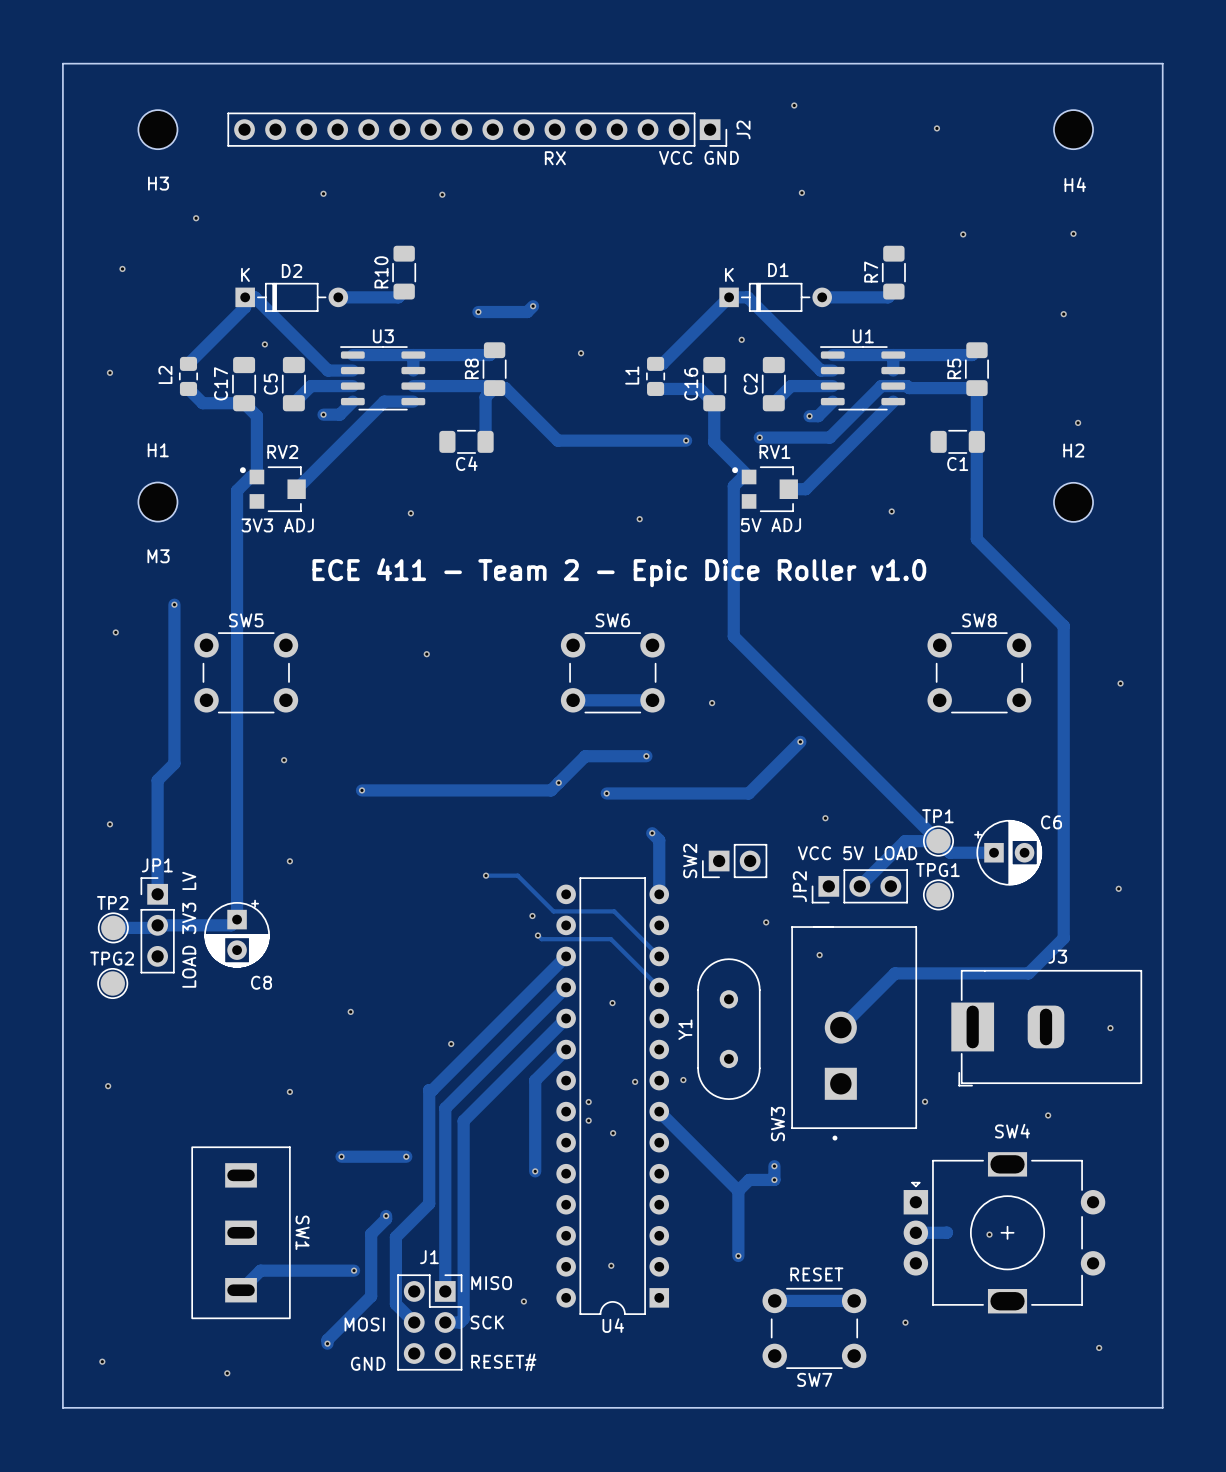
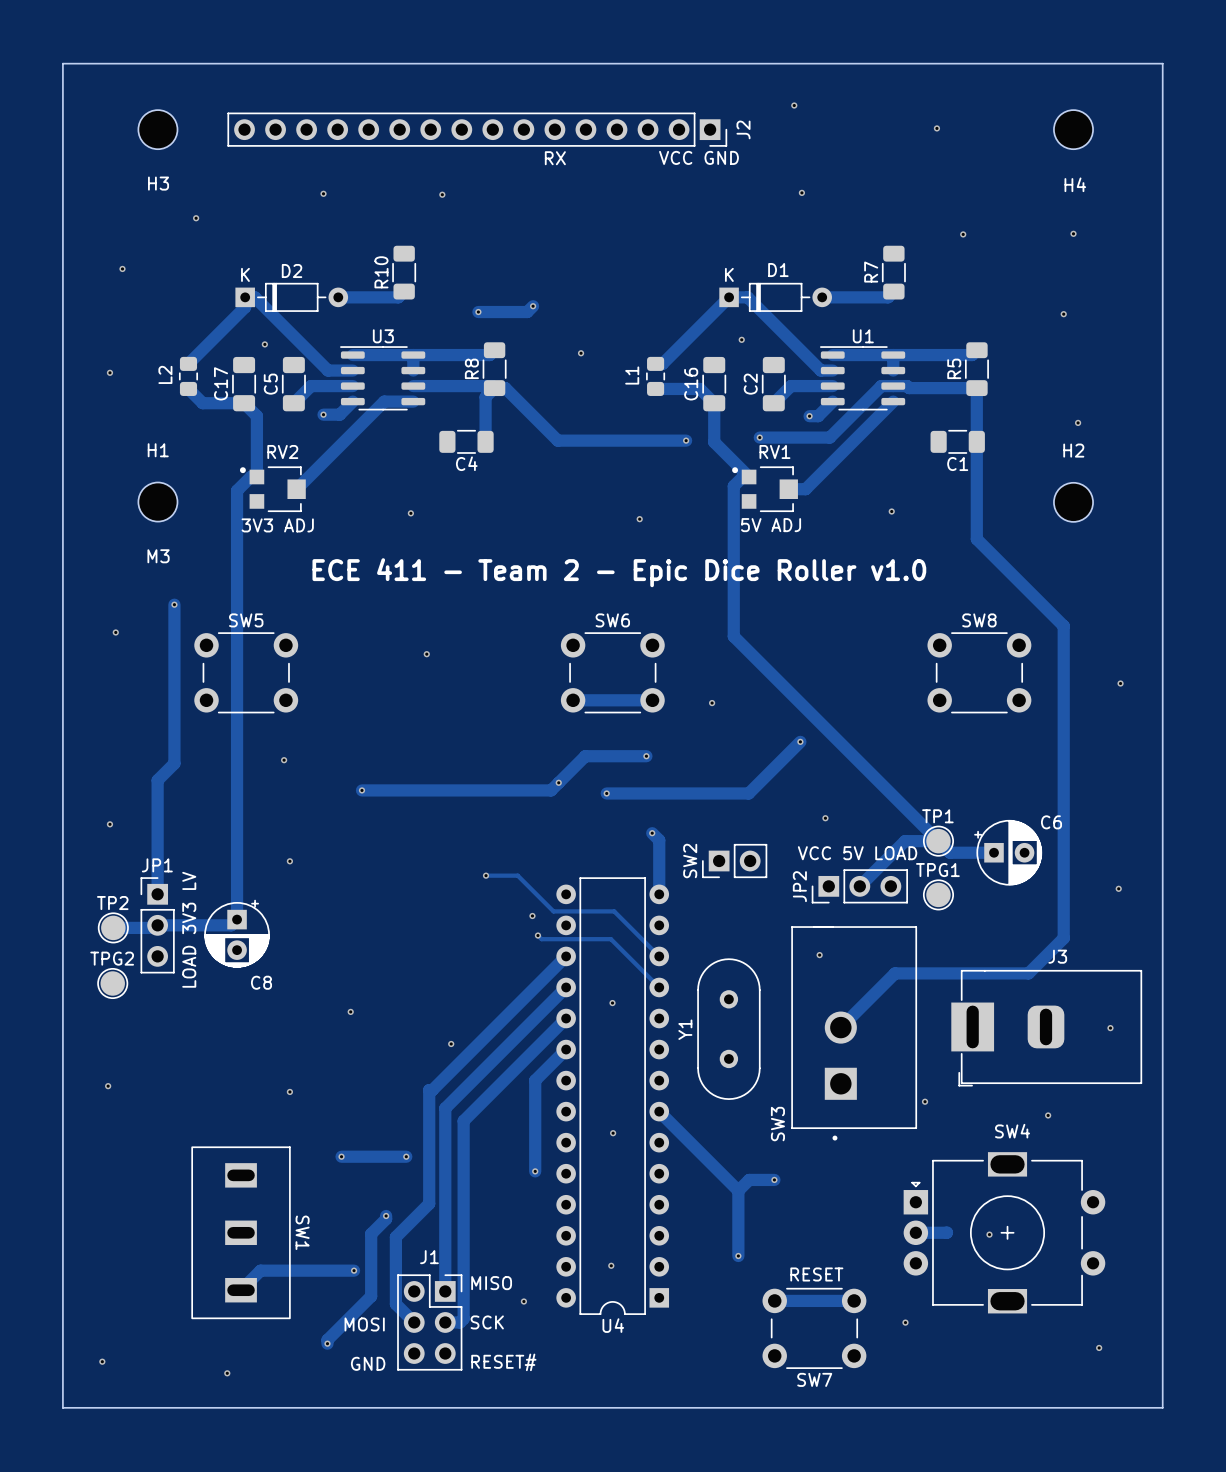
via: (766, 922) -> none
via: (683, 1080) -> none
via: (635, 1081) -> none
via: (588, 1102) -> none
via: (588, 1120) -> none
track: (774, 1166) (774, 1179) -> none
via: (774, 1166) -> none

